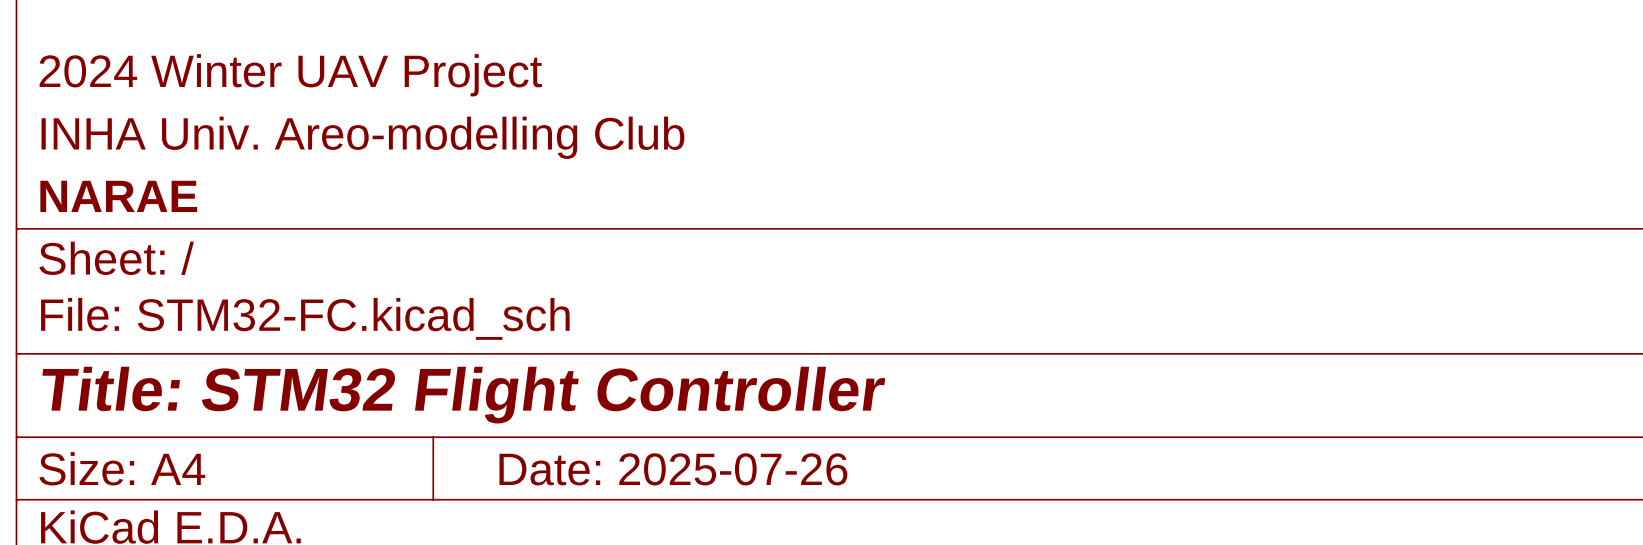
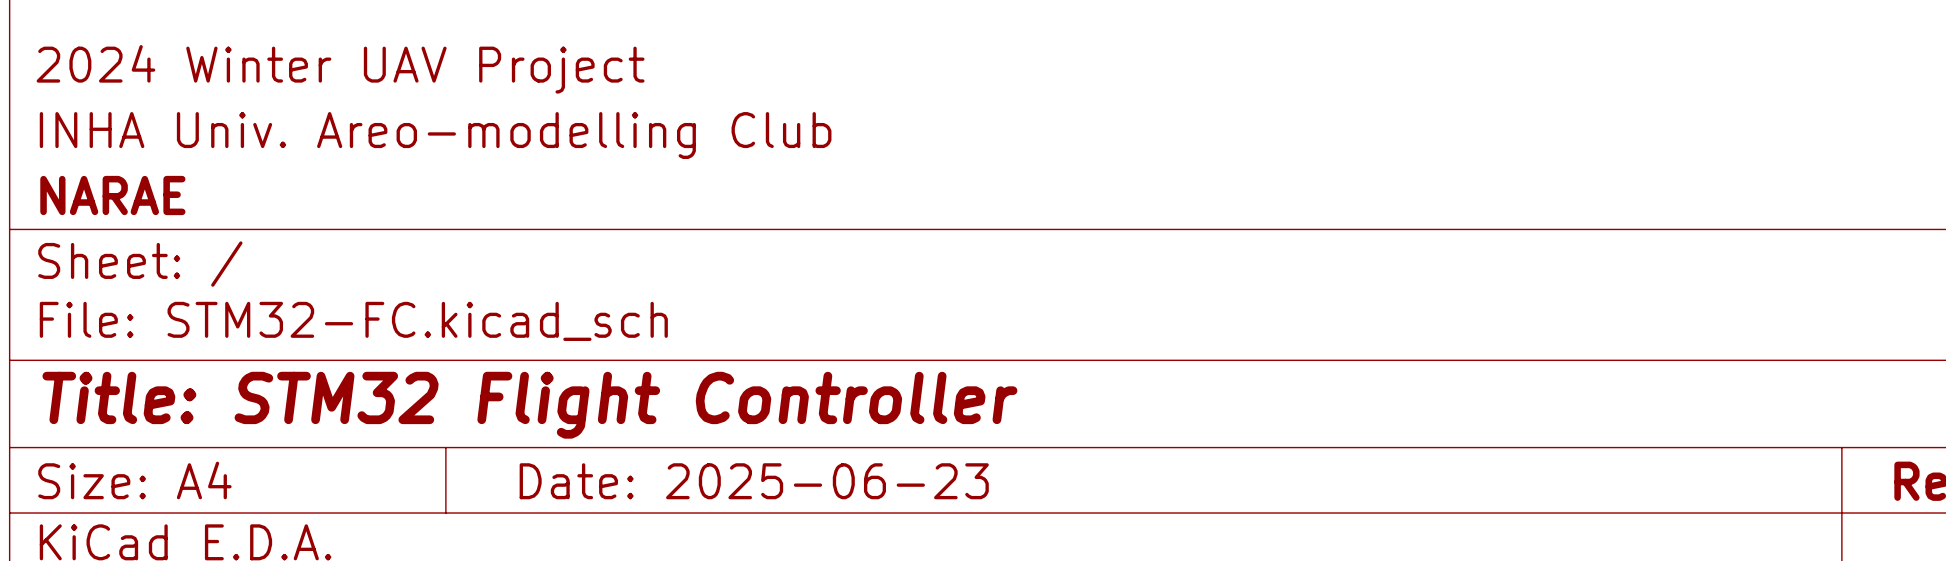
title block: Date: 2025-07-26 (673, 469) -> Date: 2025-06-23 (754, 481)

